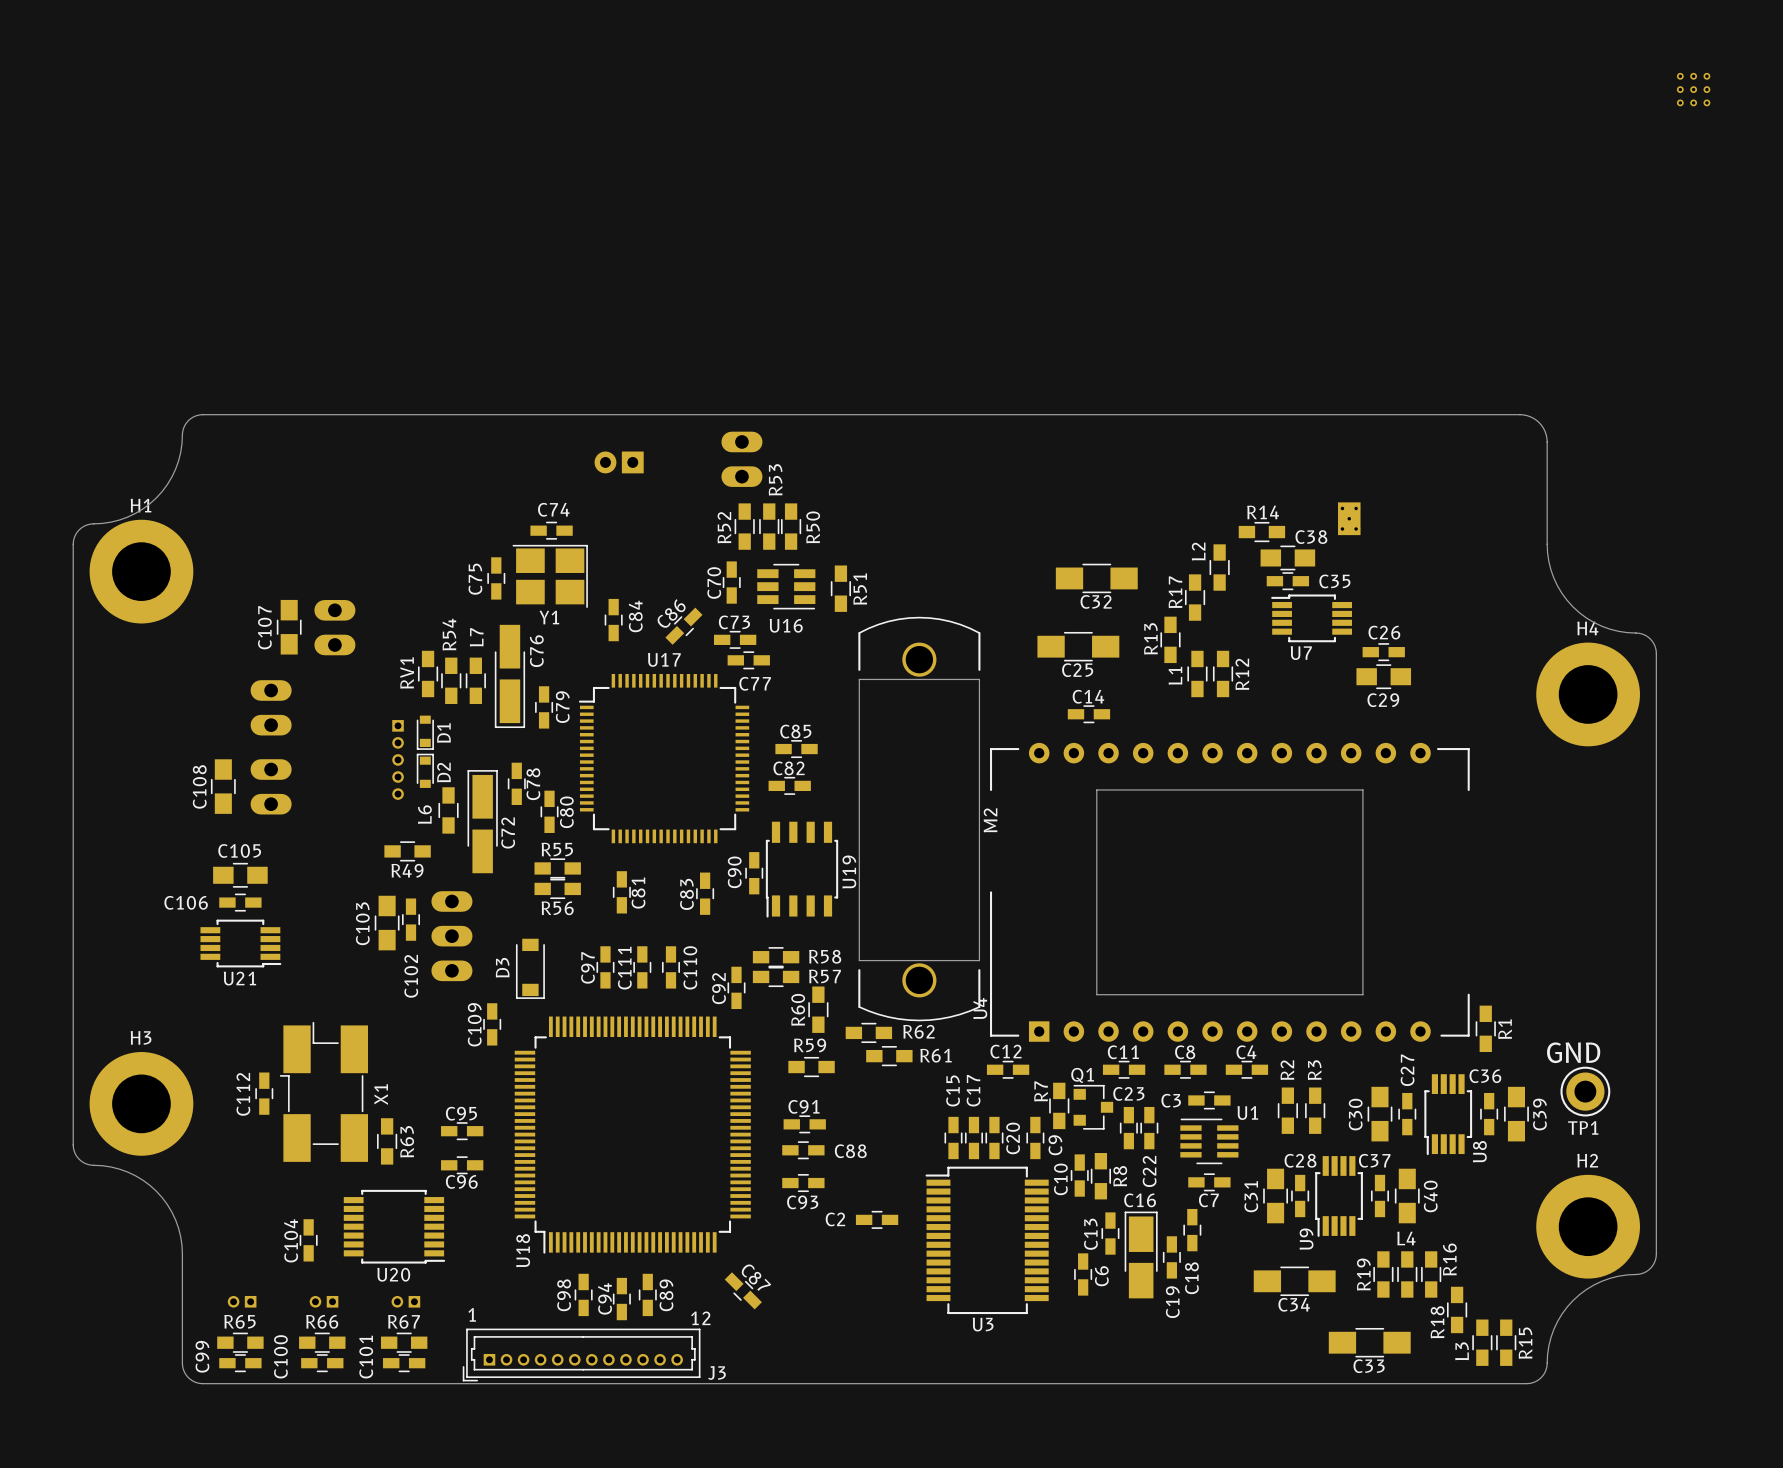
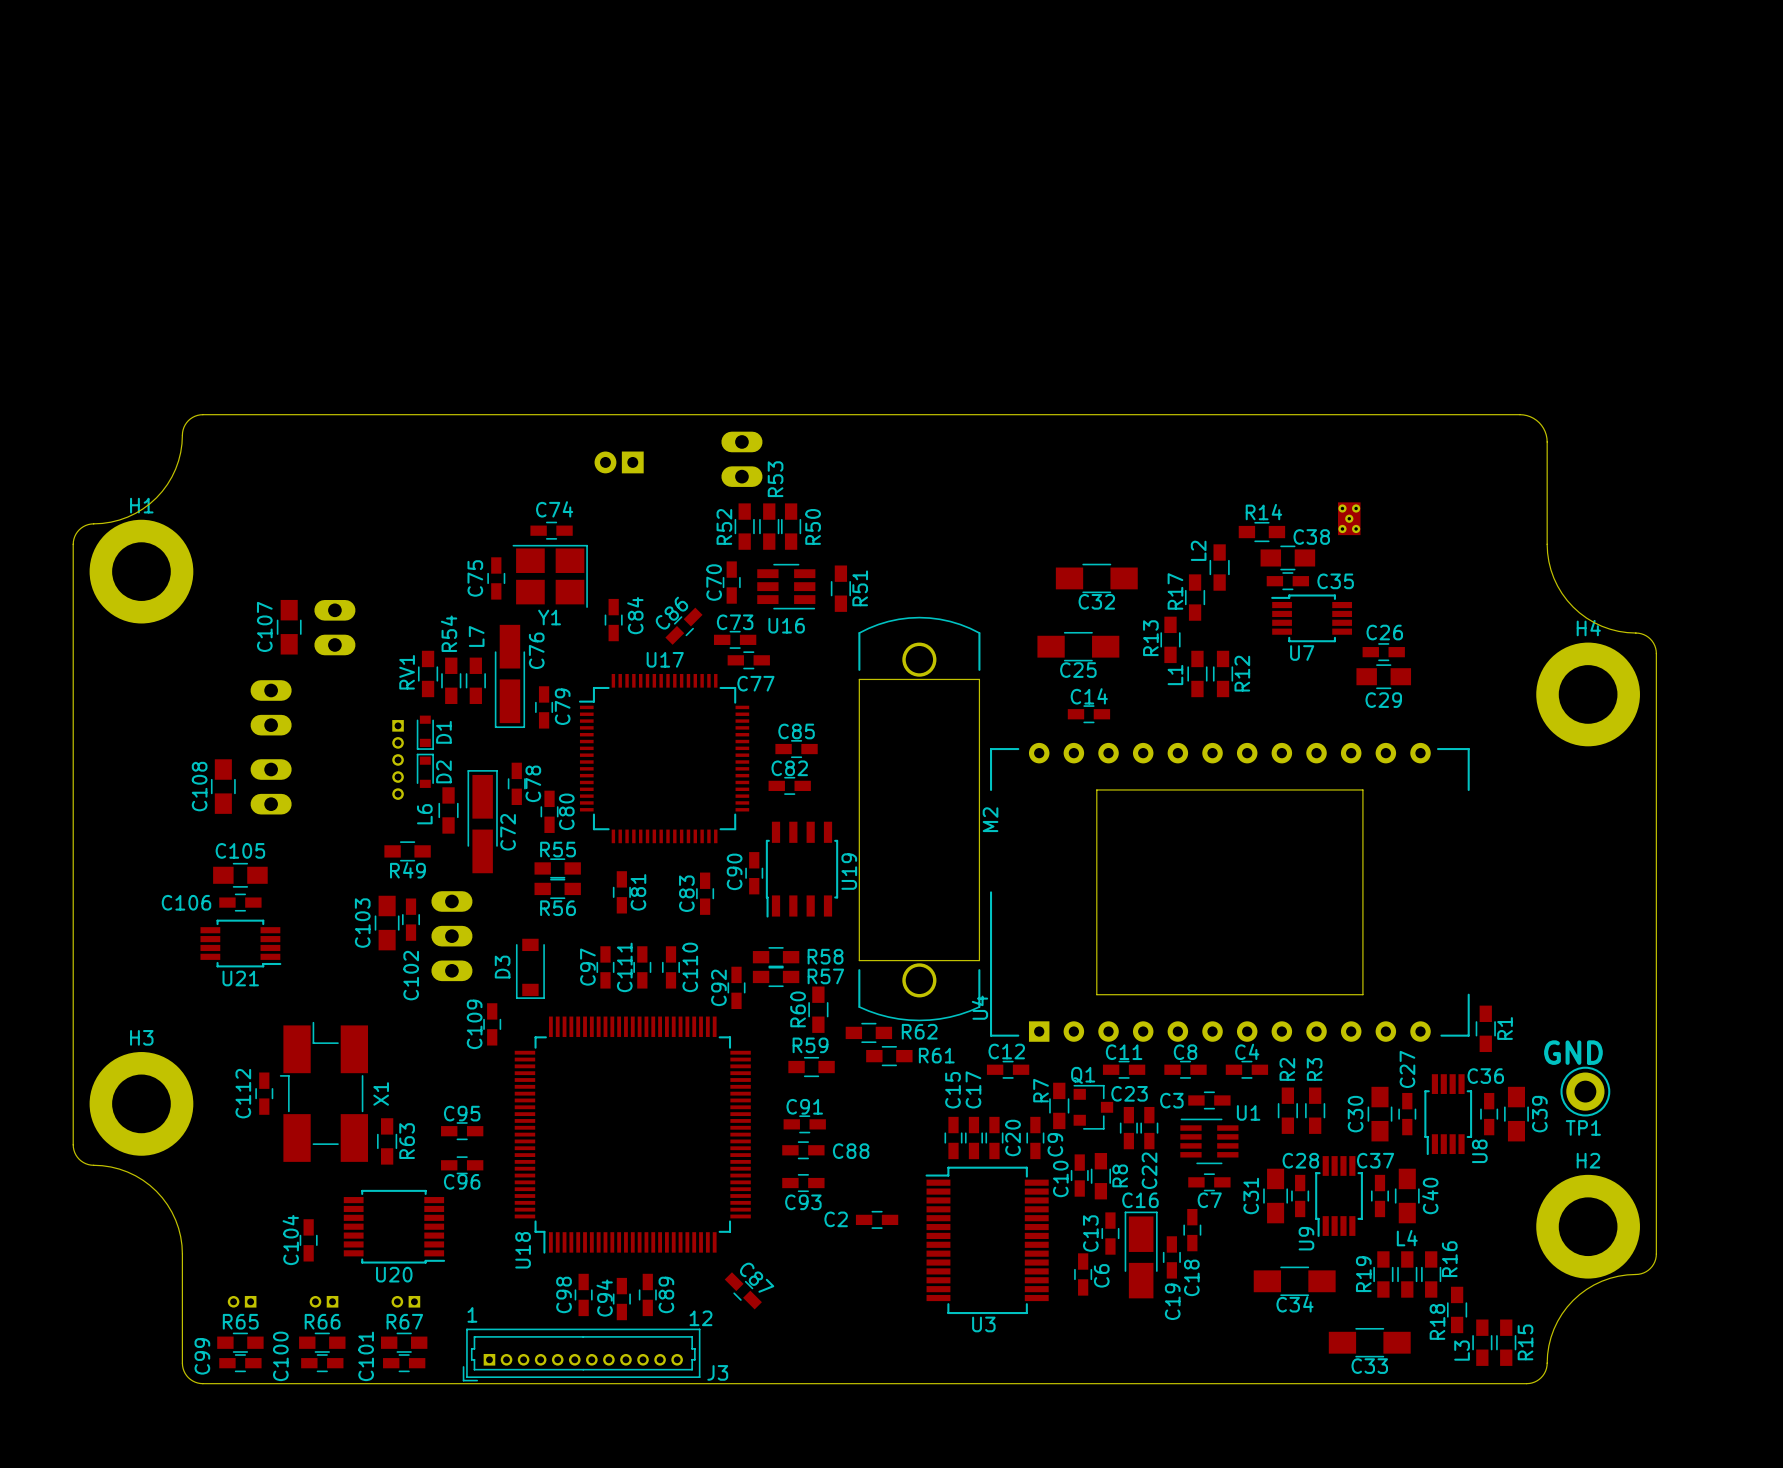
part: (1693, 89) -> none

